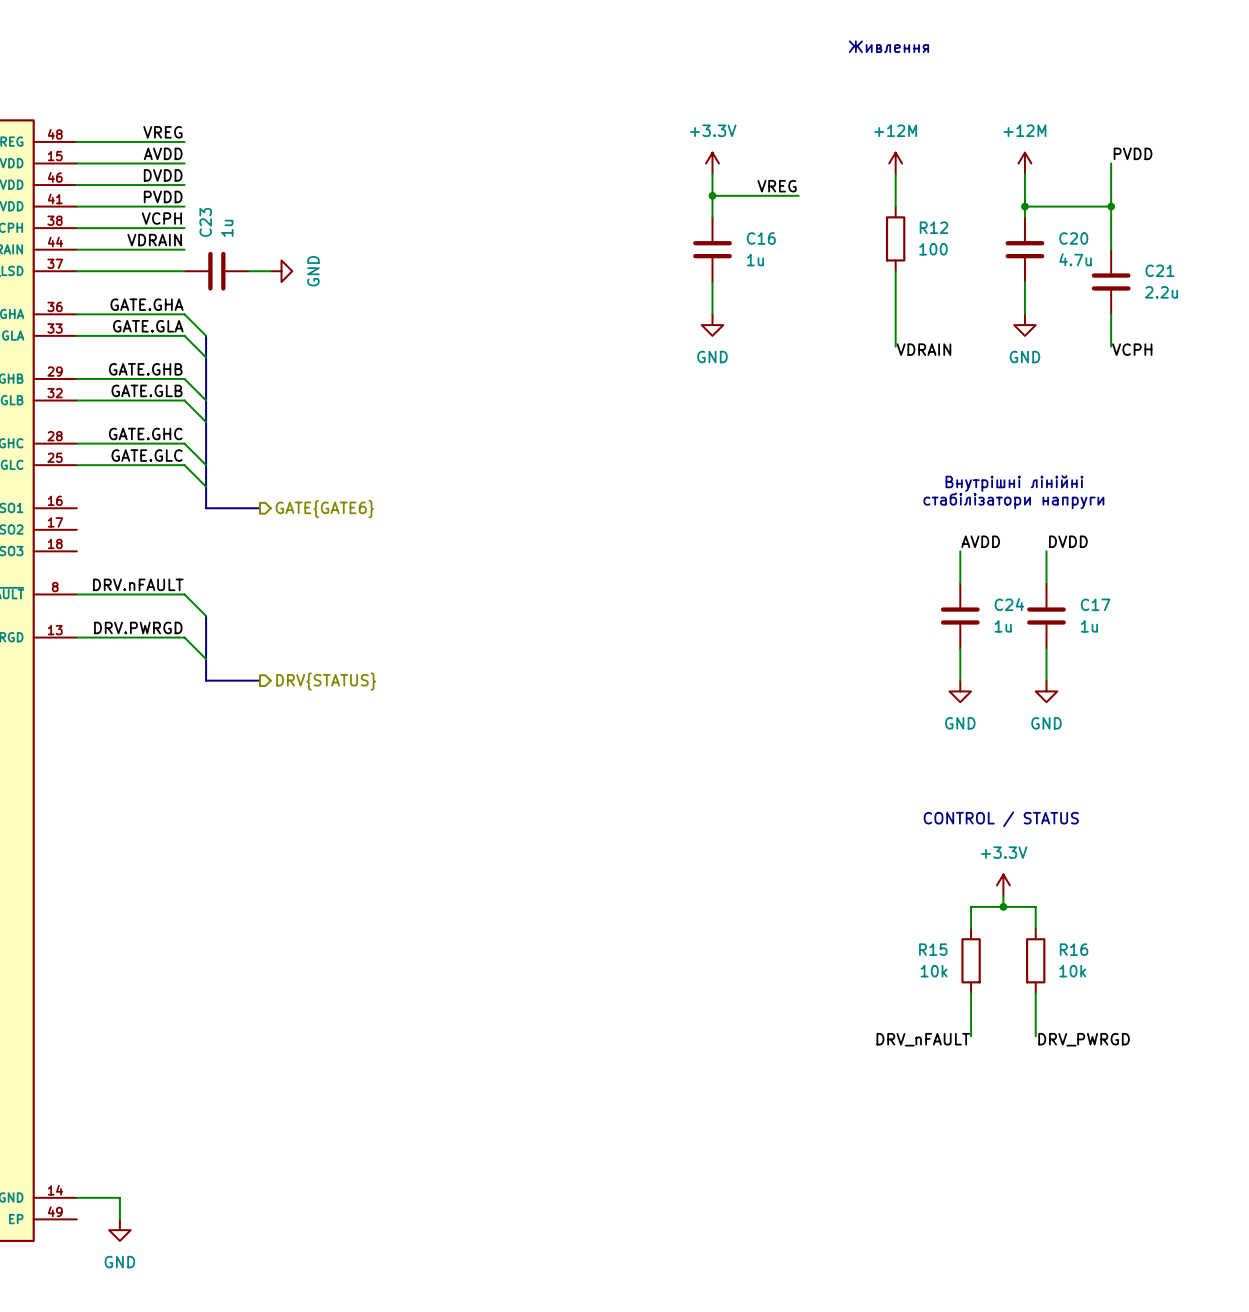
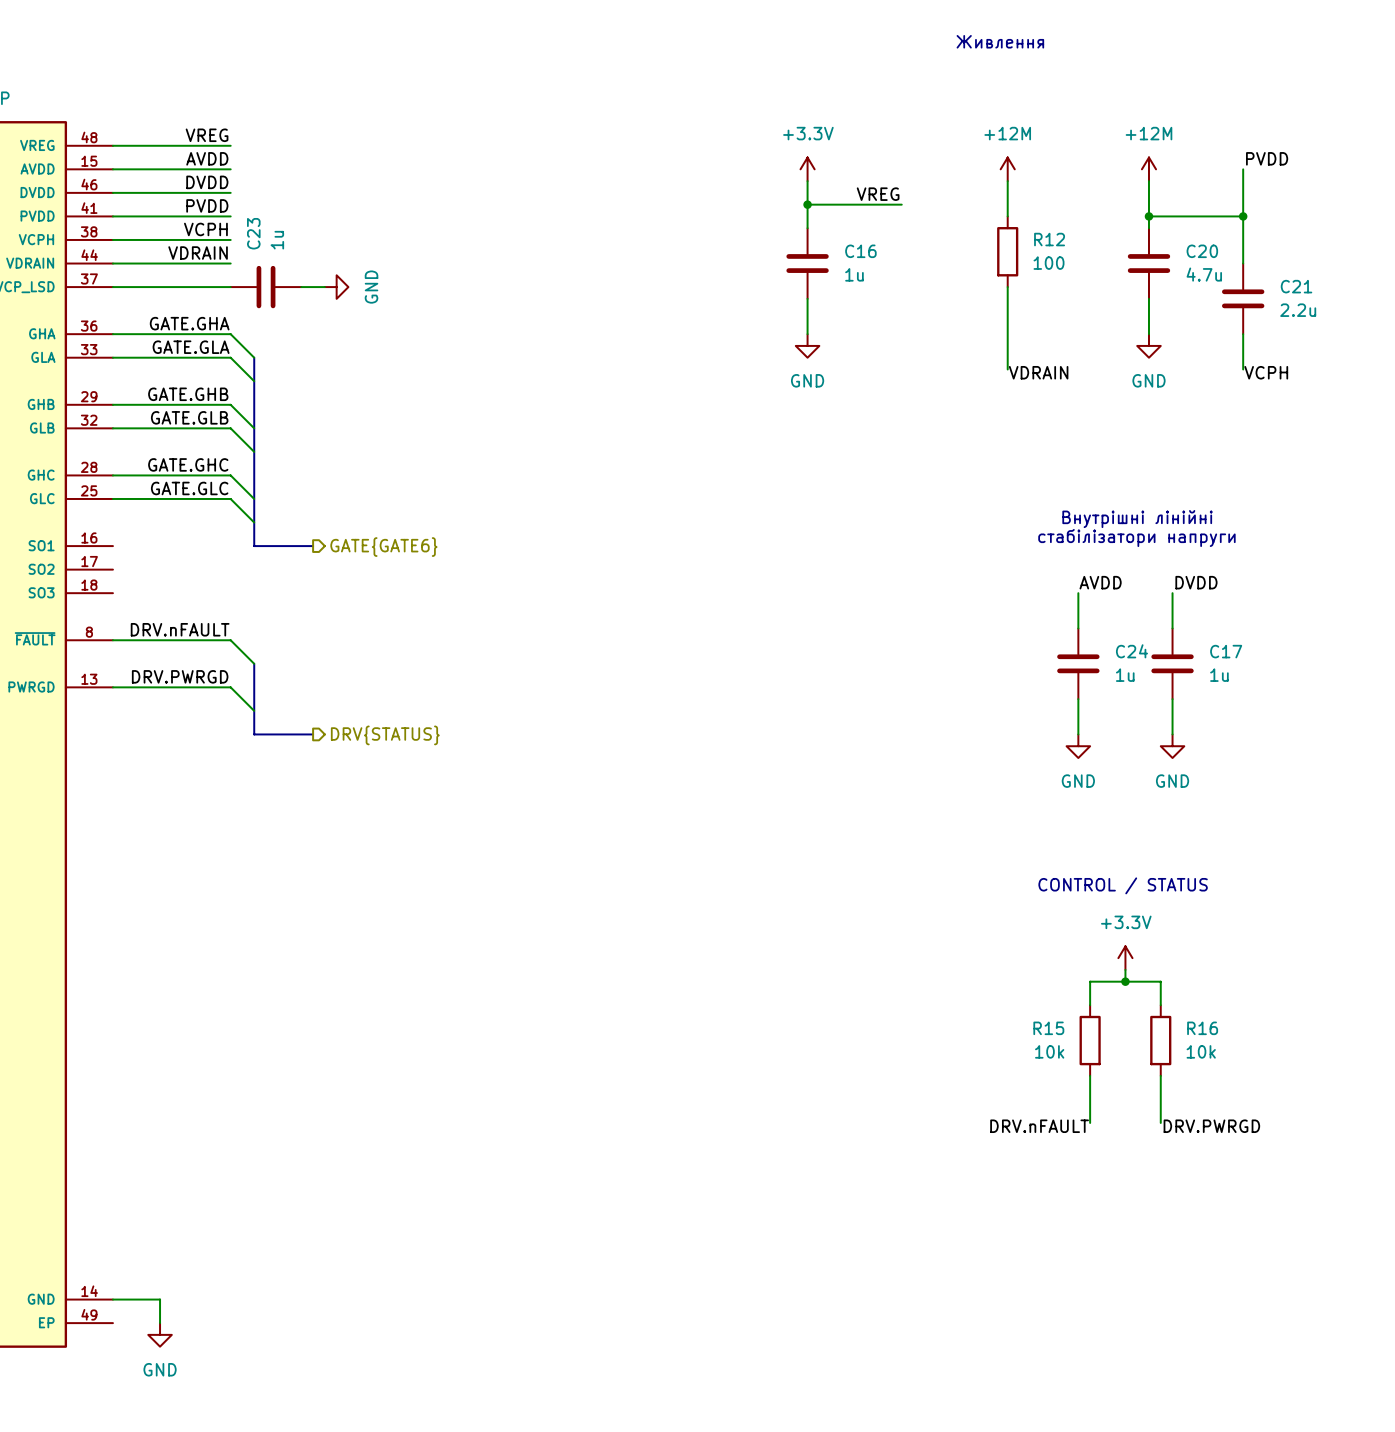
label: DRV_nFAULT (923, 1039) -> DRV.nFAULT (1039, 1126)
label: DRV_PWRGD (1084, 1039) -> DRV.PWRGD (1211, 1126)

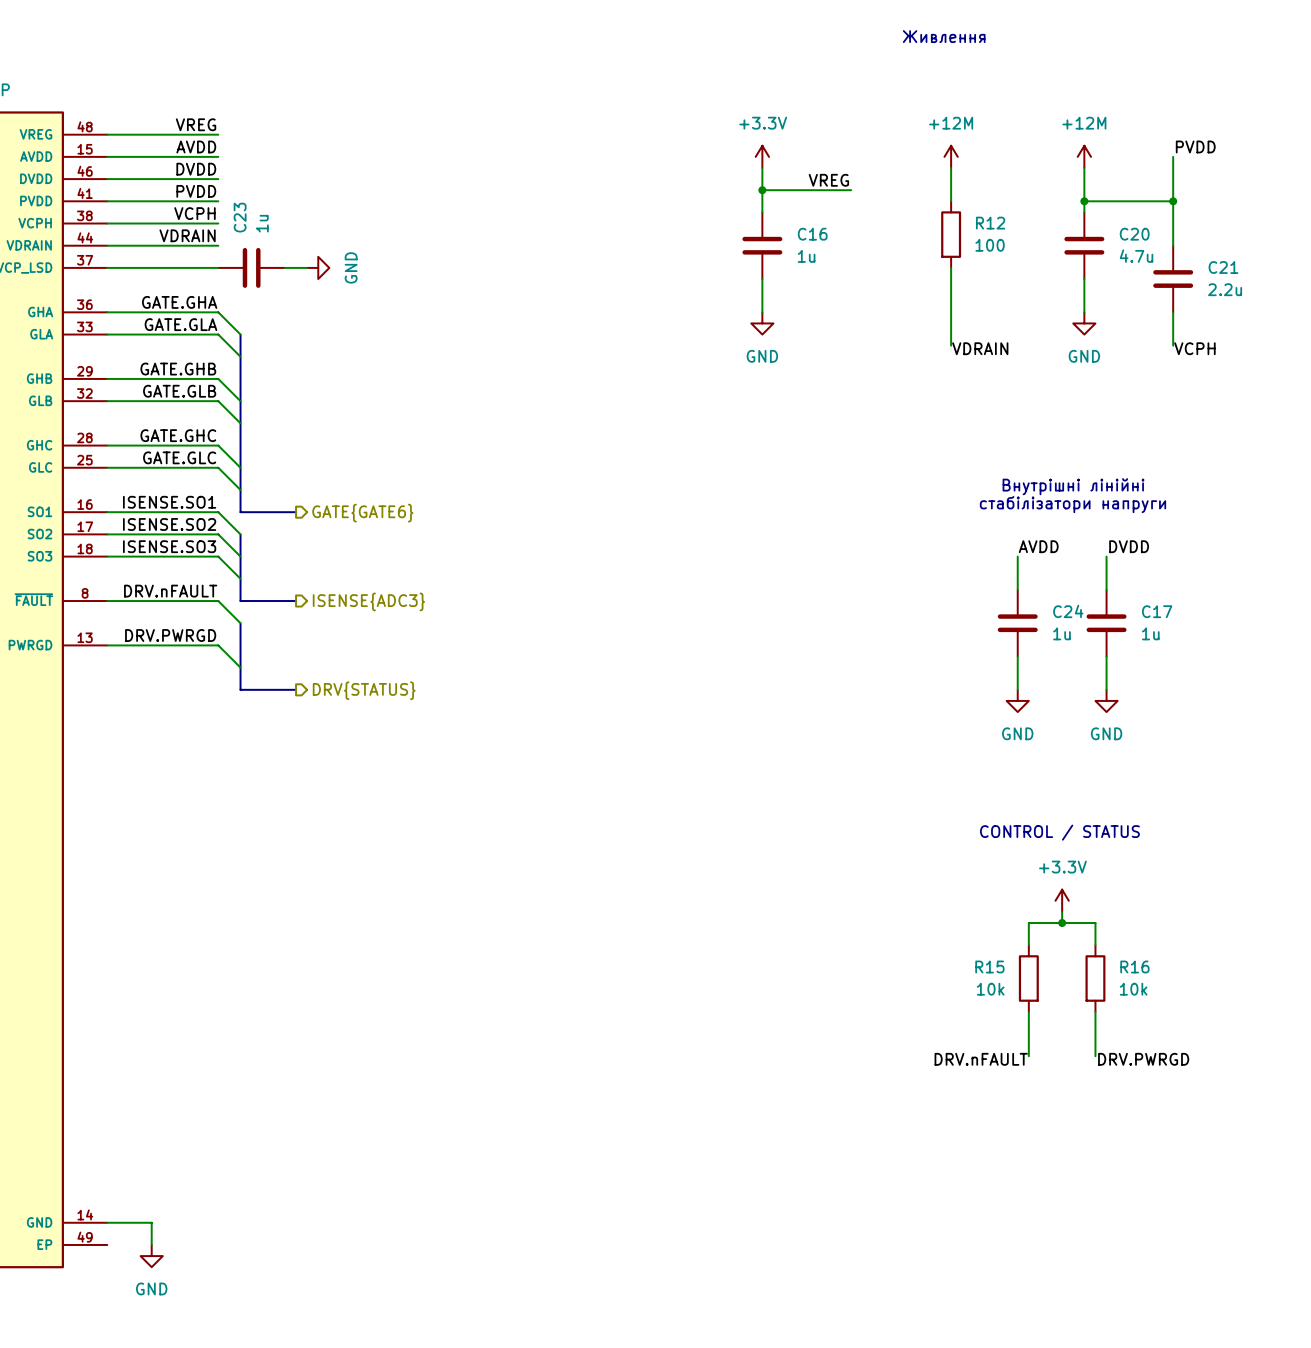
label: none -> ISENSE.SO1 (169, 502)
wire: none -> (107, 512) (218, 512) (240, 534)
label: none -> ISENSE.SO2 (169, 524)
wire: none -> (107, 534) (218, 534) (240, 556)
bus: none -> (240, 534) (240, 601) (296, 601)
label: none -> ISENSE.SO3 (169, 546)
wire: none -> (107, 556) (218, 556) (240, 578)
hierarchical label: none -> ISENSE{ADC3} (368, 601)

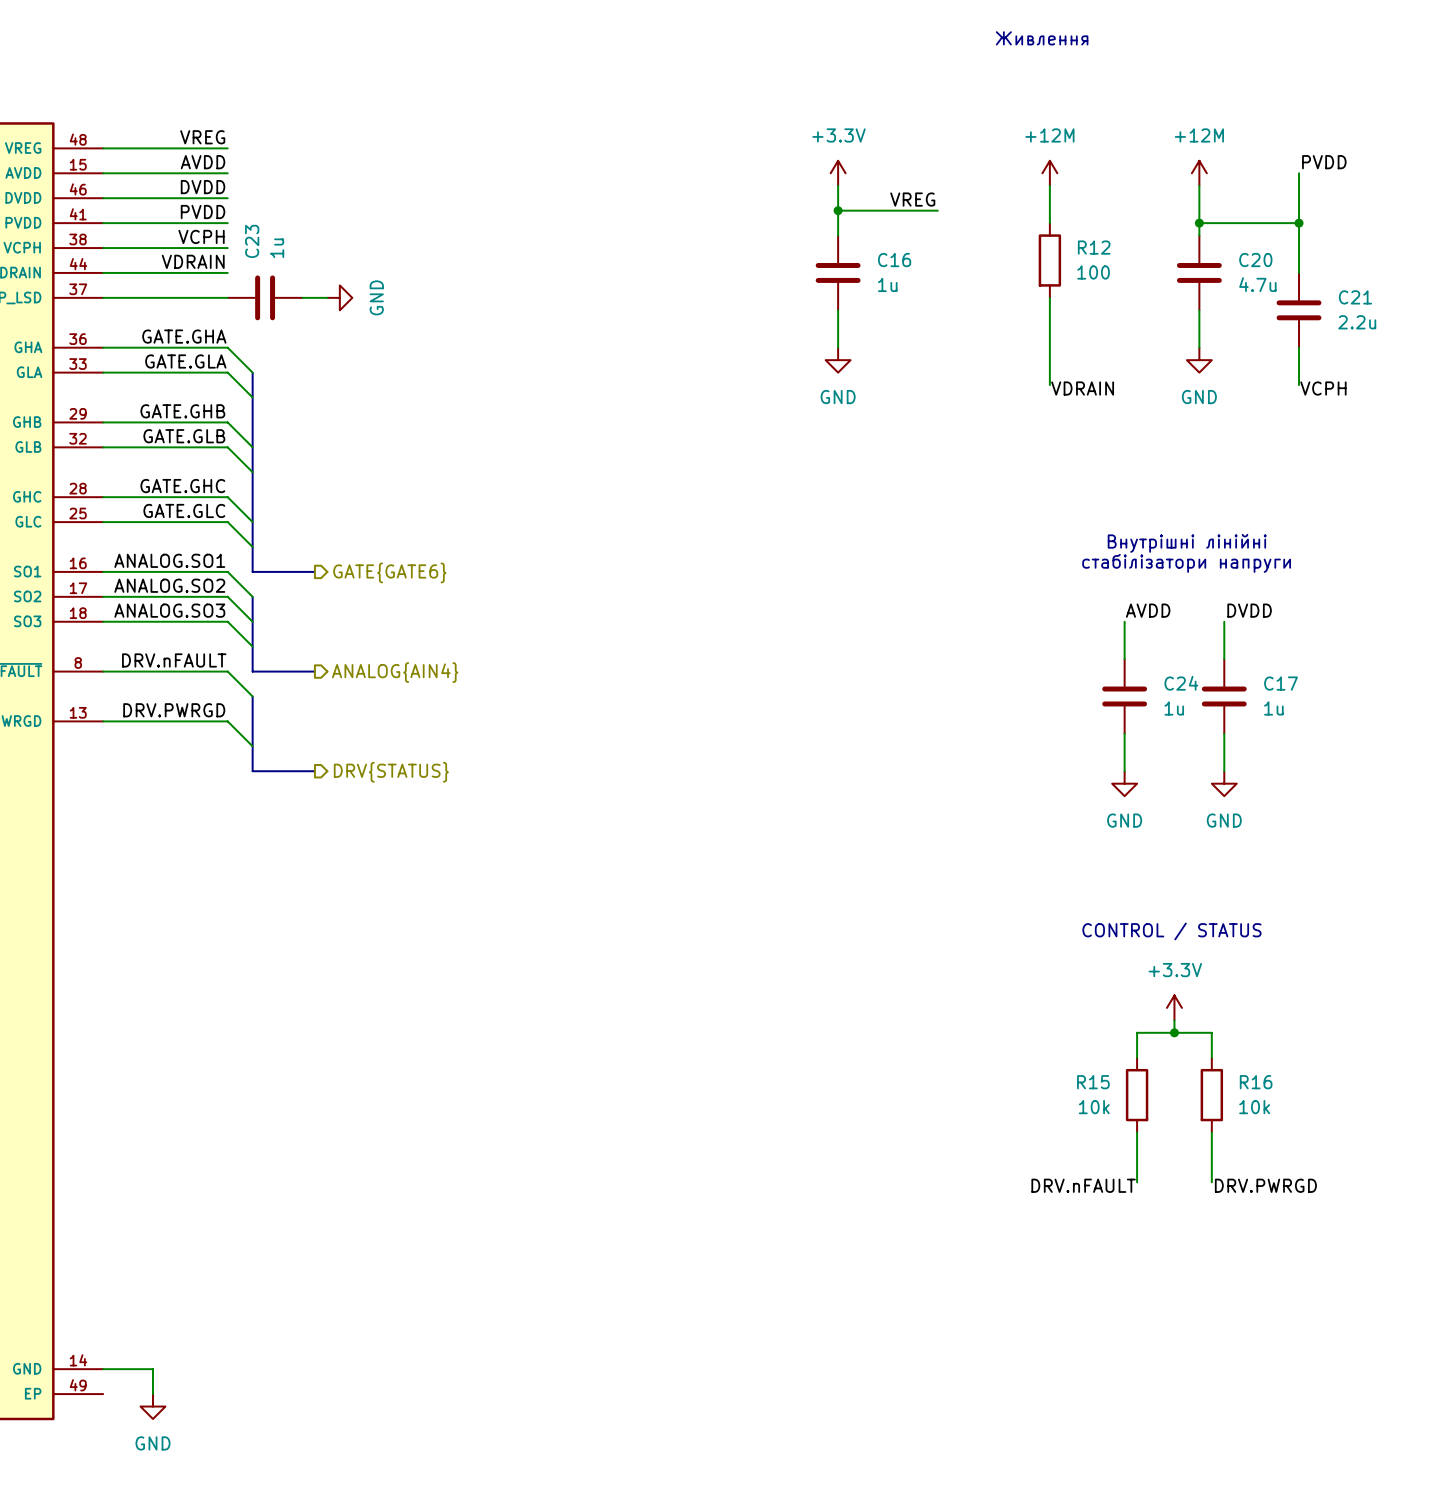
label: ISENSE.SO1 (169, 502) -> ANALOG.SO1 (169, 560)
label: ISENSE.SO2 (169, 524) -> ANALOG.SO2 (169, 585)
label: ISENSE.SO3 (169, 546) -> ANALOG.SO3 (169, 610)
hierarchical label: ISENSE{ADC3} (368, 601) -> ANALOG{AIN4} (395, 672)

